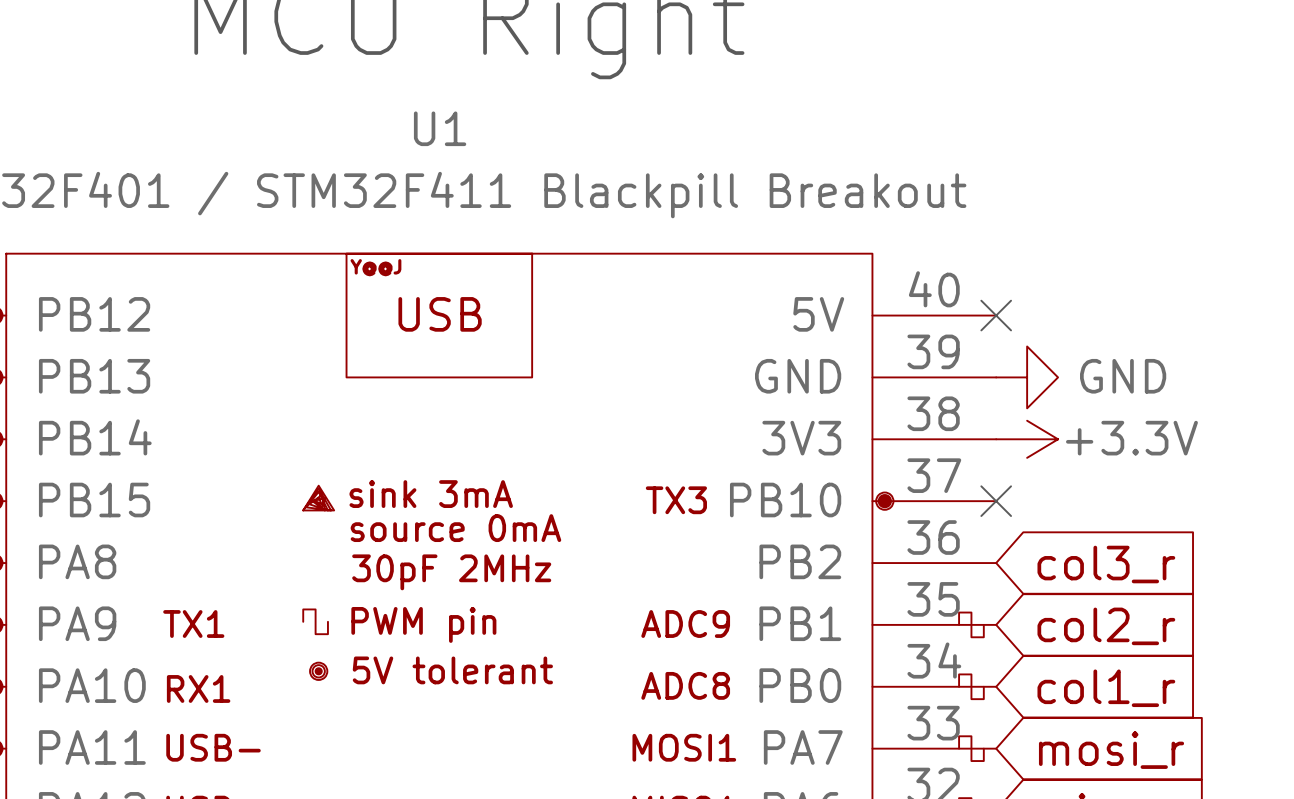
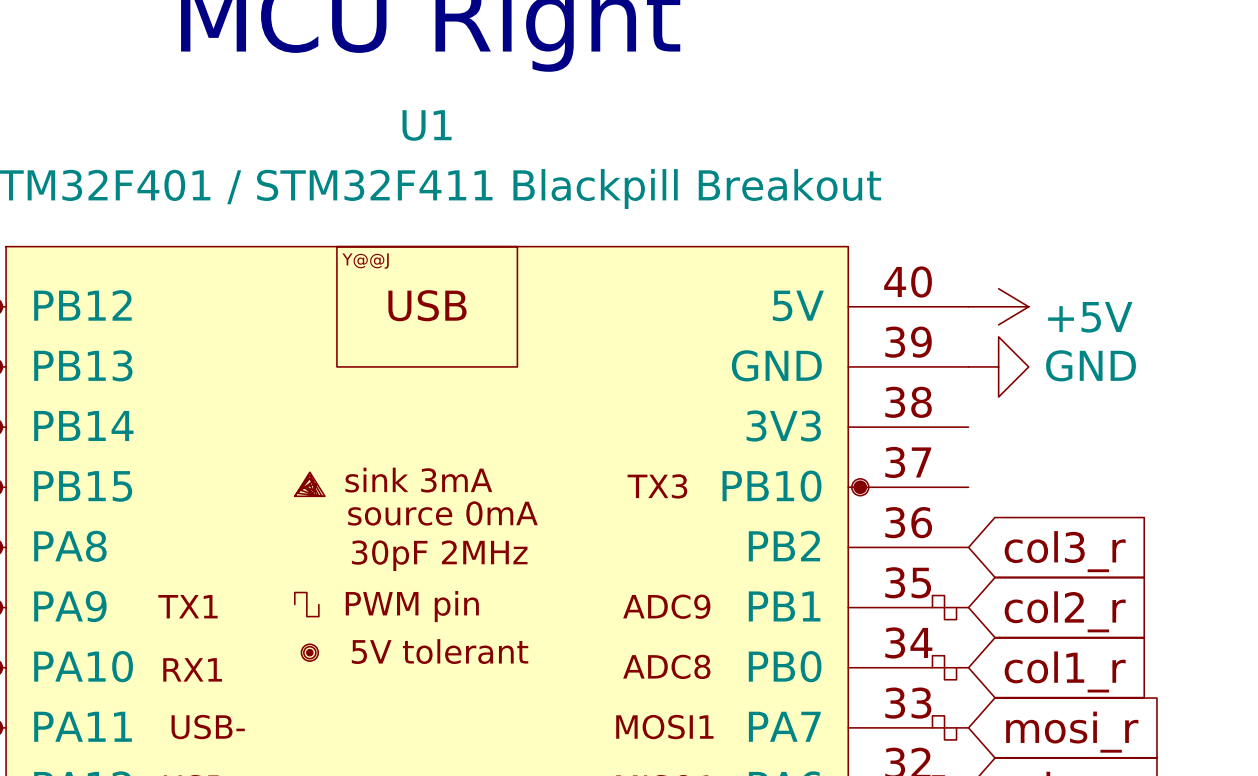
no-connect mark: (996, 315) -> none
power symbol: none -> +5V (998, 306)
power symbol: +3.3V (1027, 439) -> none
no-connect mark: (996, 501) -> none

